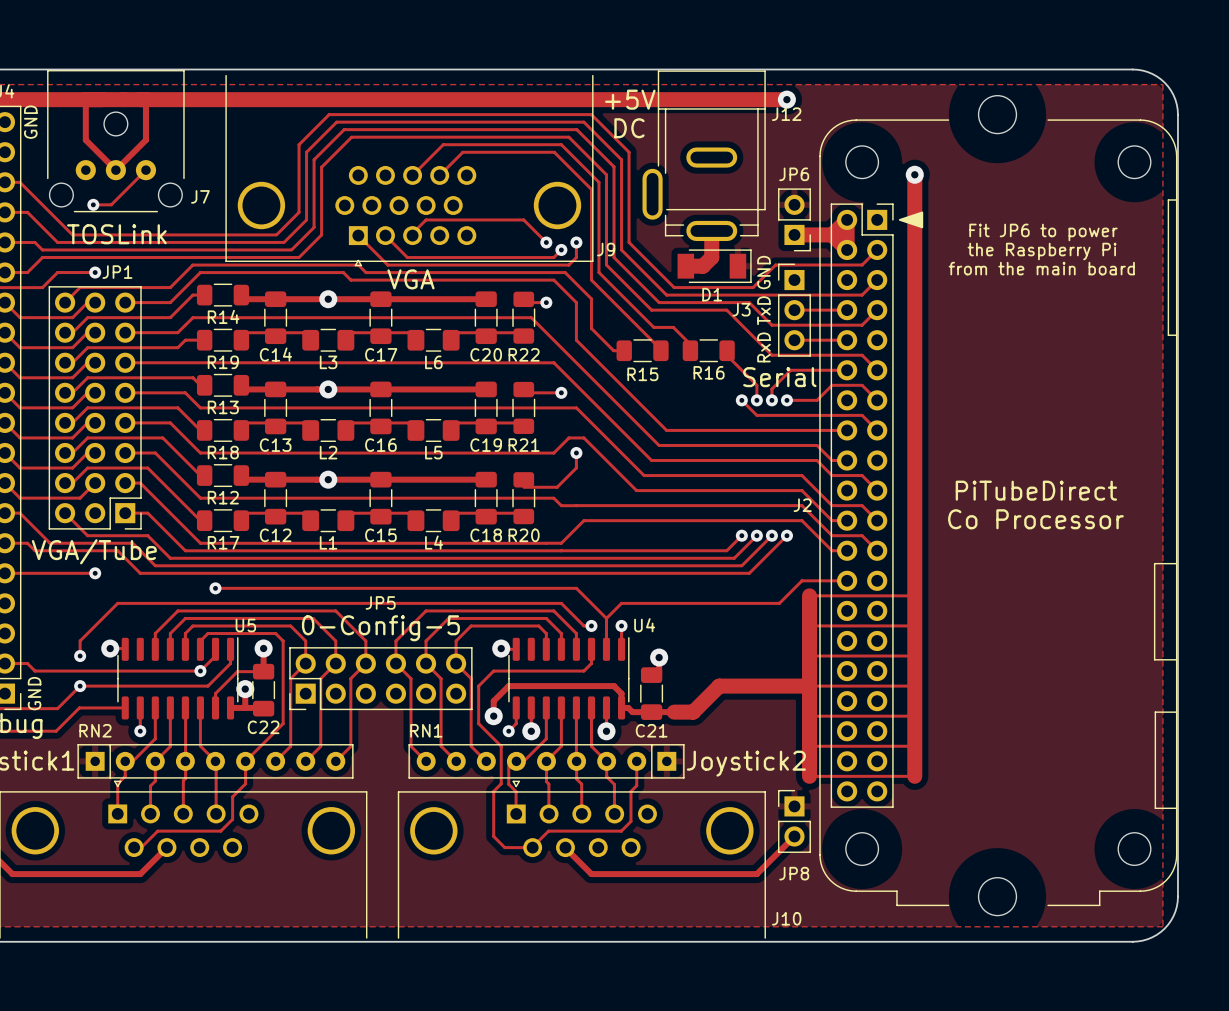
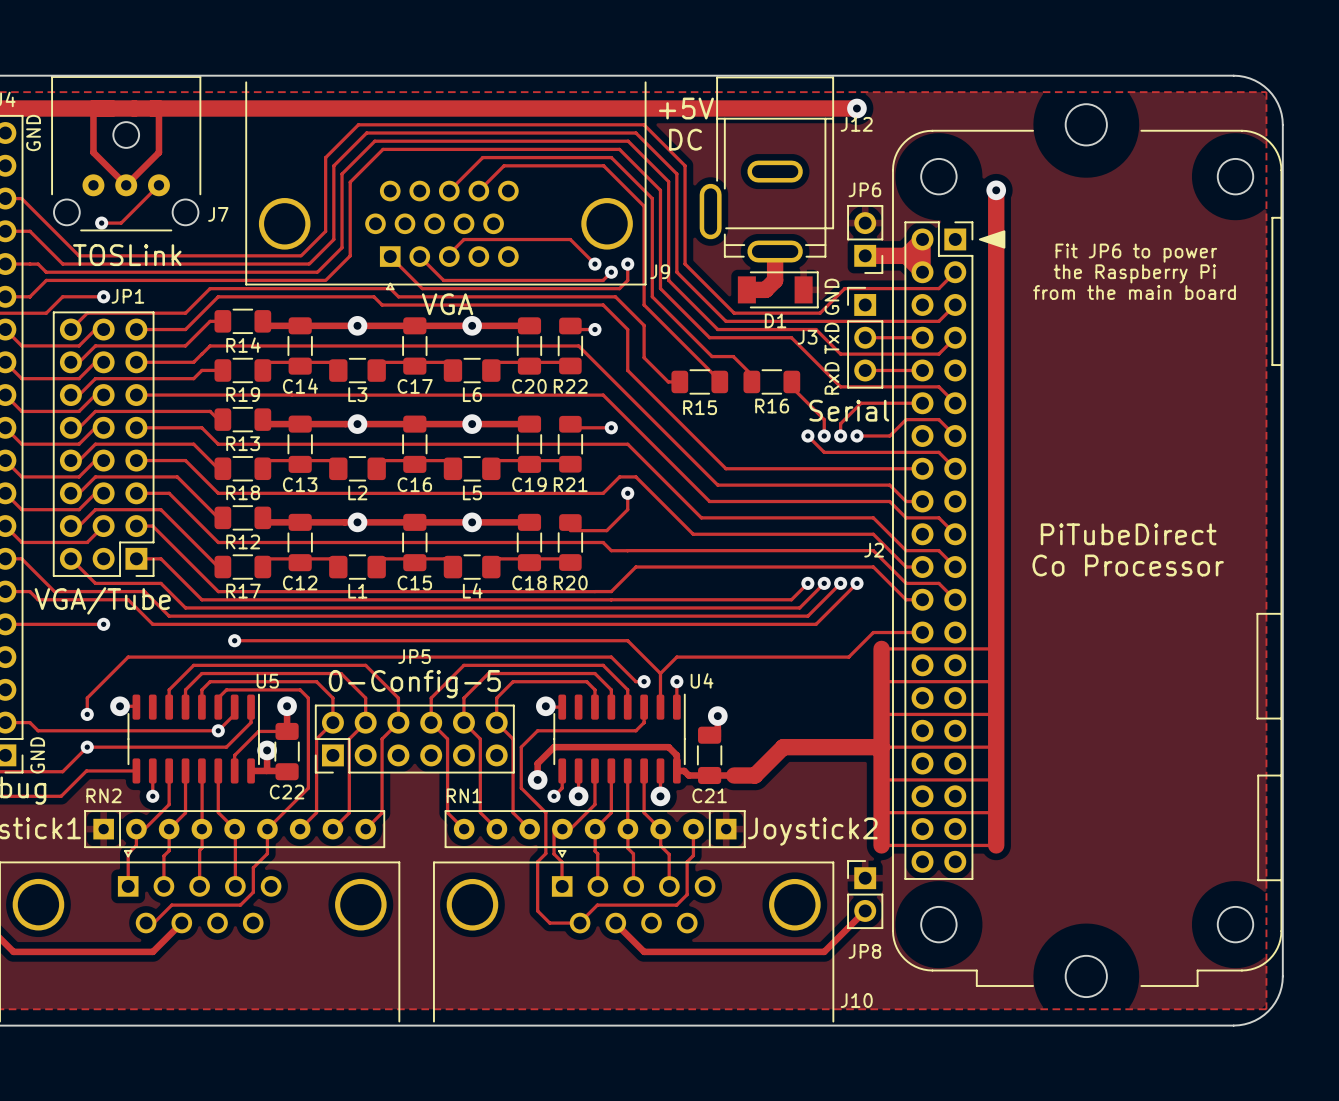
via: none -> (472, 325)
via: none -> (472, 424)
via: none -> (472, 522)

